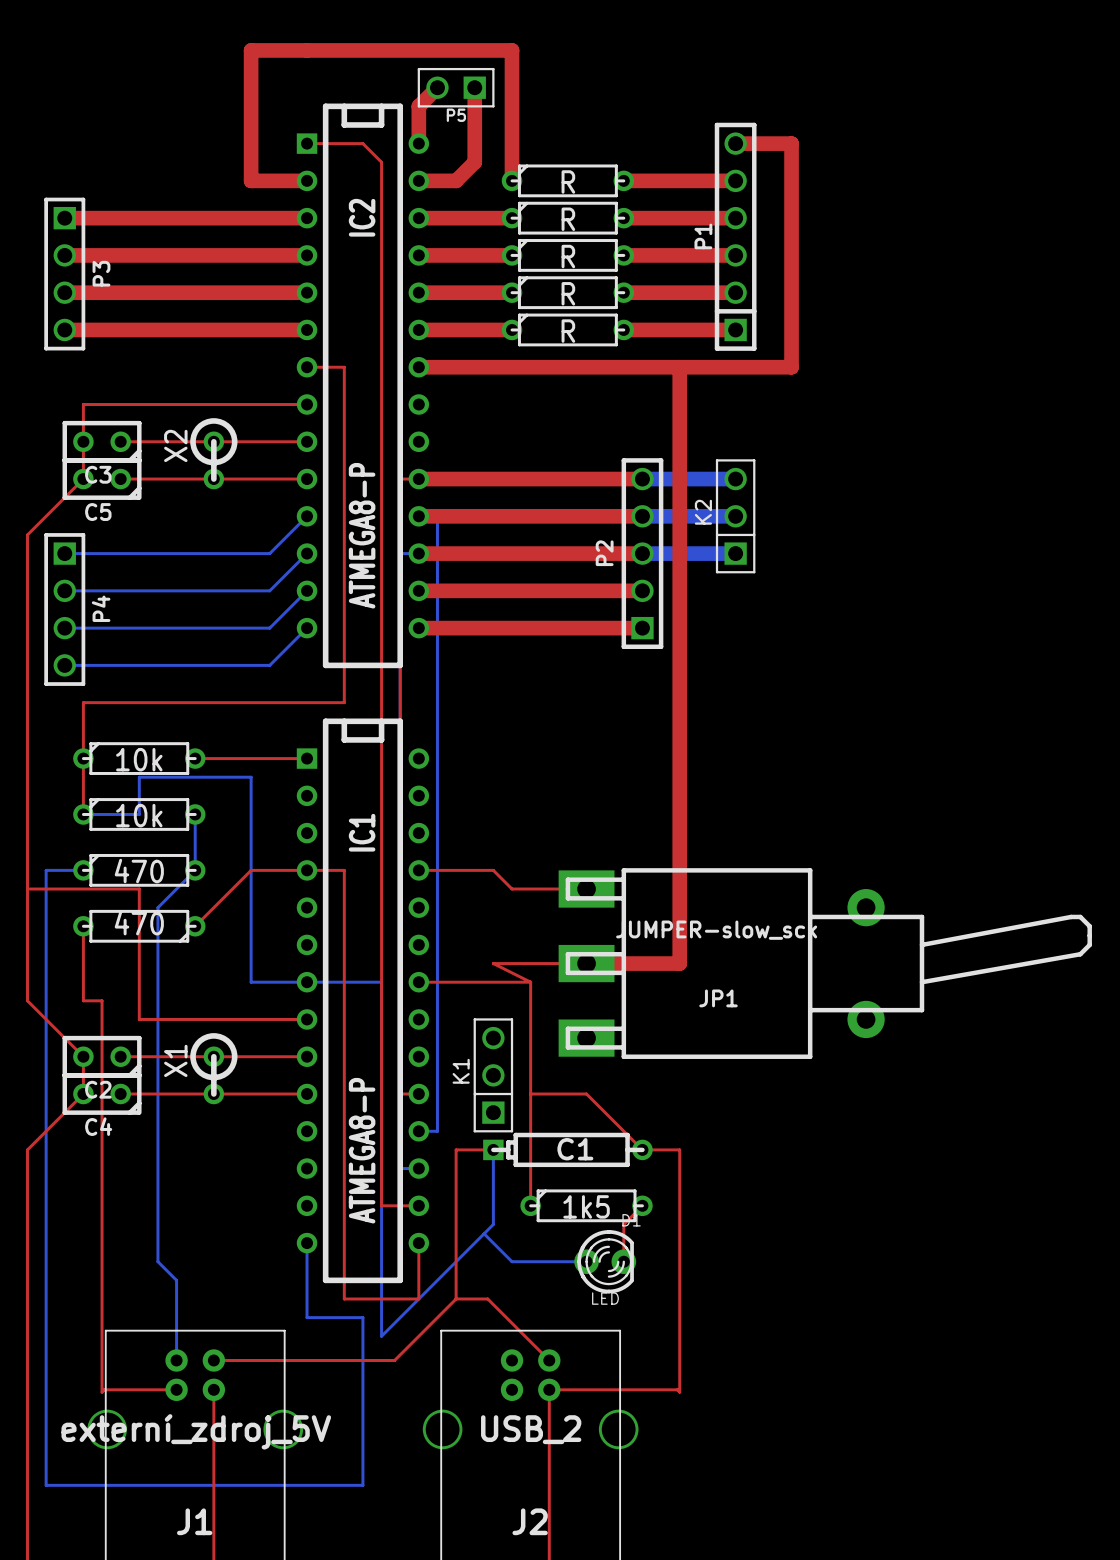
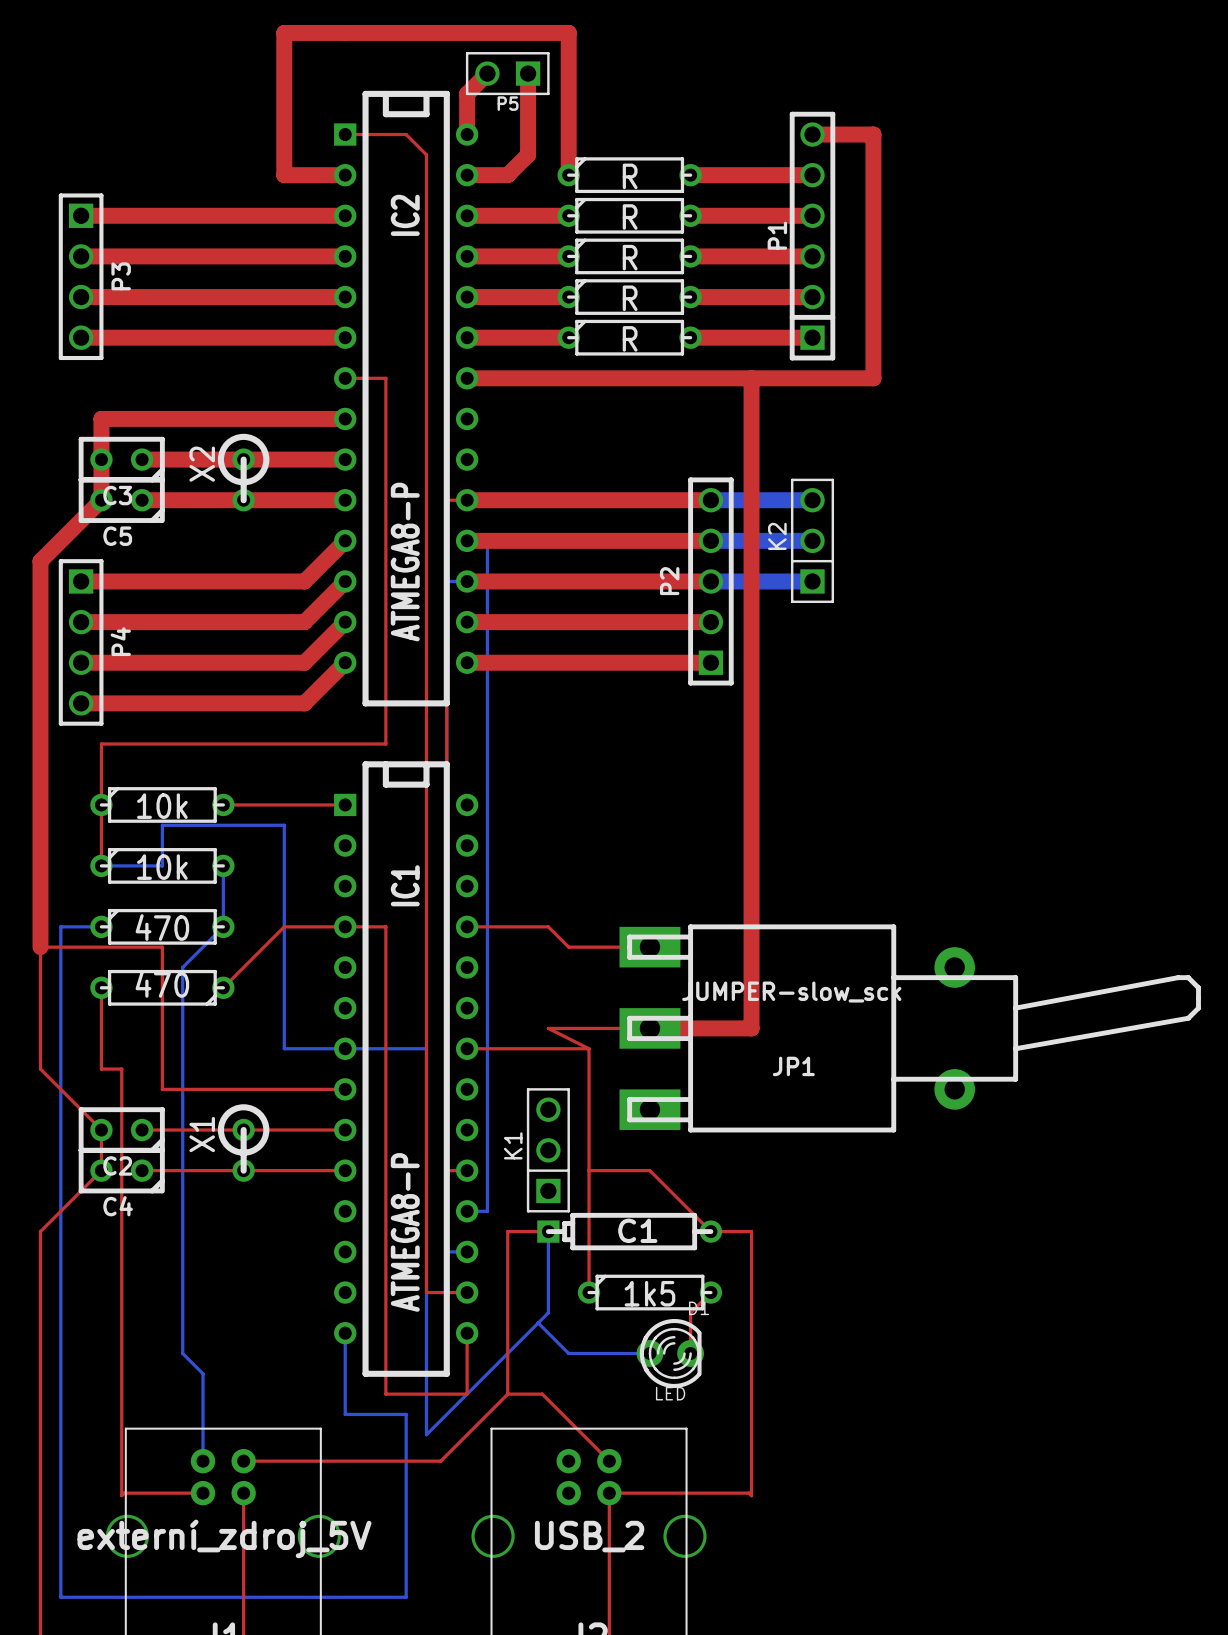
top track width: thin (307, 404) (83, 404) (83, 479) (27, 534) (27, 889) -> thick (345, 418) (101, 418) (101, 500) (40, 561) (40, 947)
top track width: thin (120, 441) (307, 441) -> thick (142, 459) (345, 459)
top track width: thin (120, 479) (307, 479) -> thick (142, 500) (345, 500)
top track: none -> (345, 540) (304, 581) (81, 581)
bottom track: (307, 516) (269, 553) (64, 553) -> none
top track: none -> (345, 581) (304, 622) (81, 622)
bottom track: (307, 553) (269, 590) (64, 590) -> none
top track: none -> (345, 622) (304, 662) (81, 662)
bottom track: (307, 590) (269, 628) (64, 628) -> none
top track: none -> (345, 662) (304, 703) (81, 703)
bottom track: (307, 628) (269, 665) (64, 665) -> none

